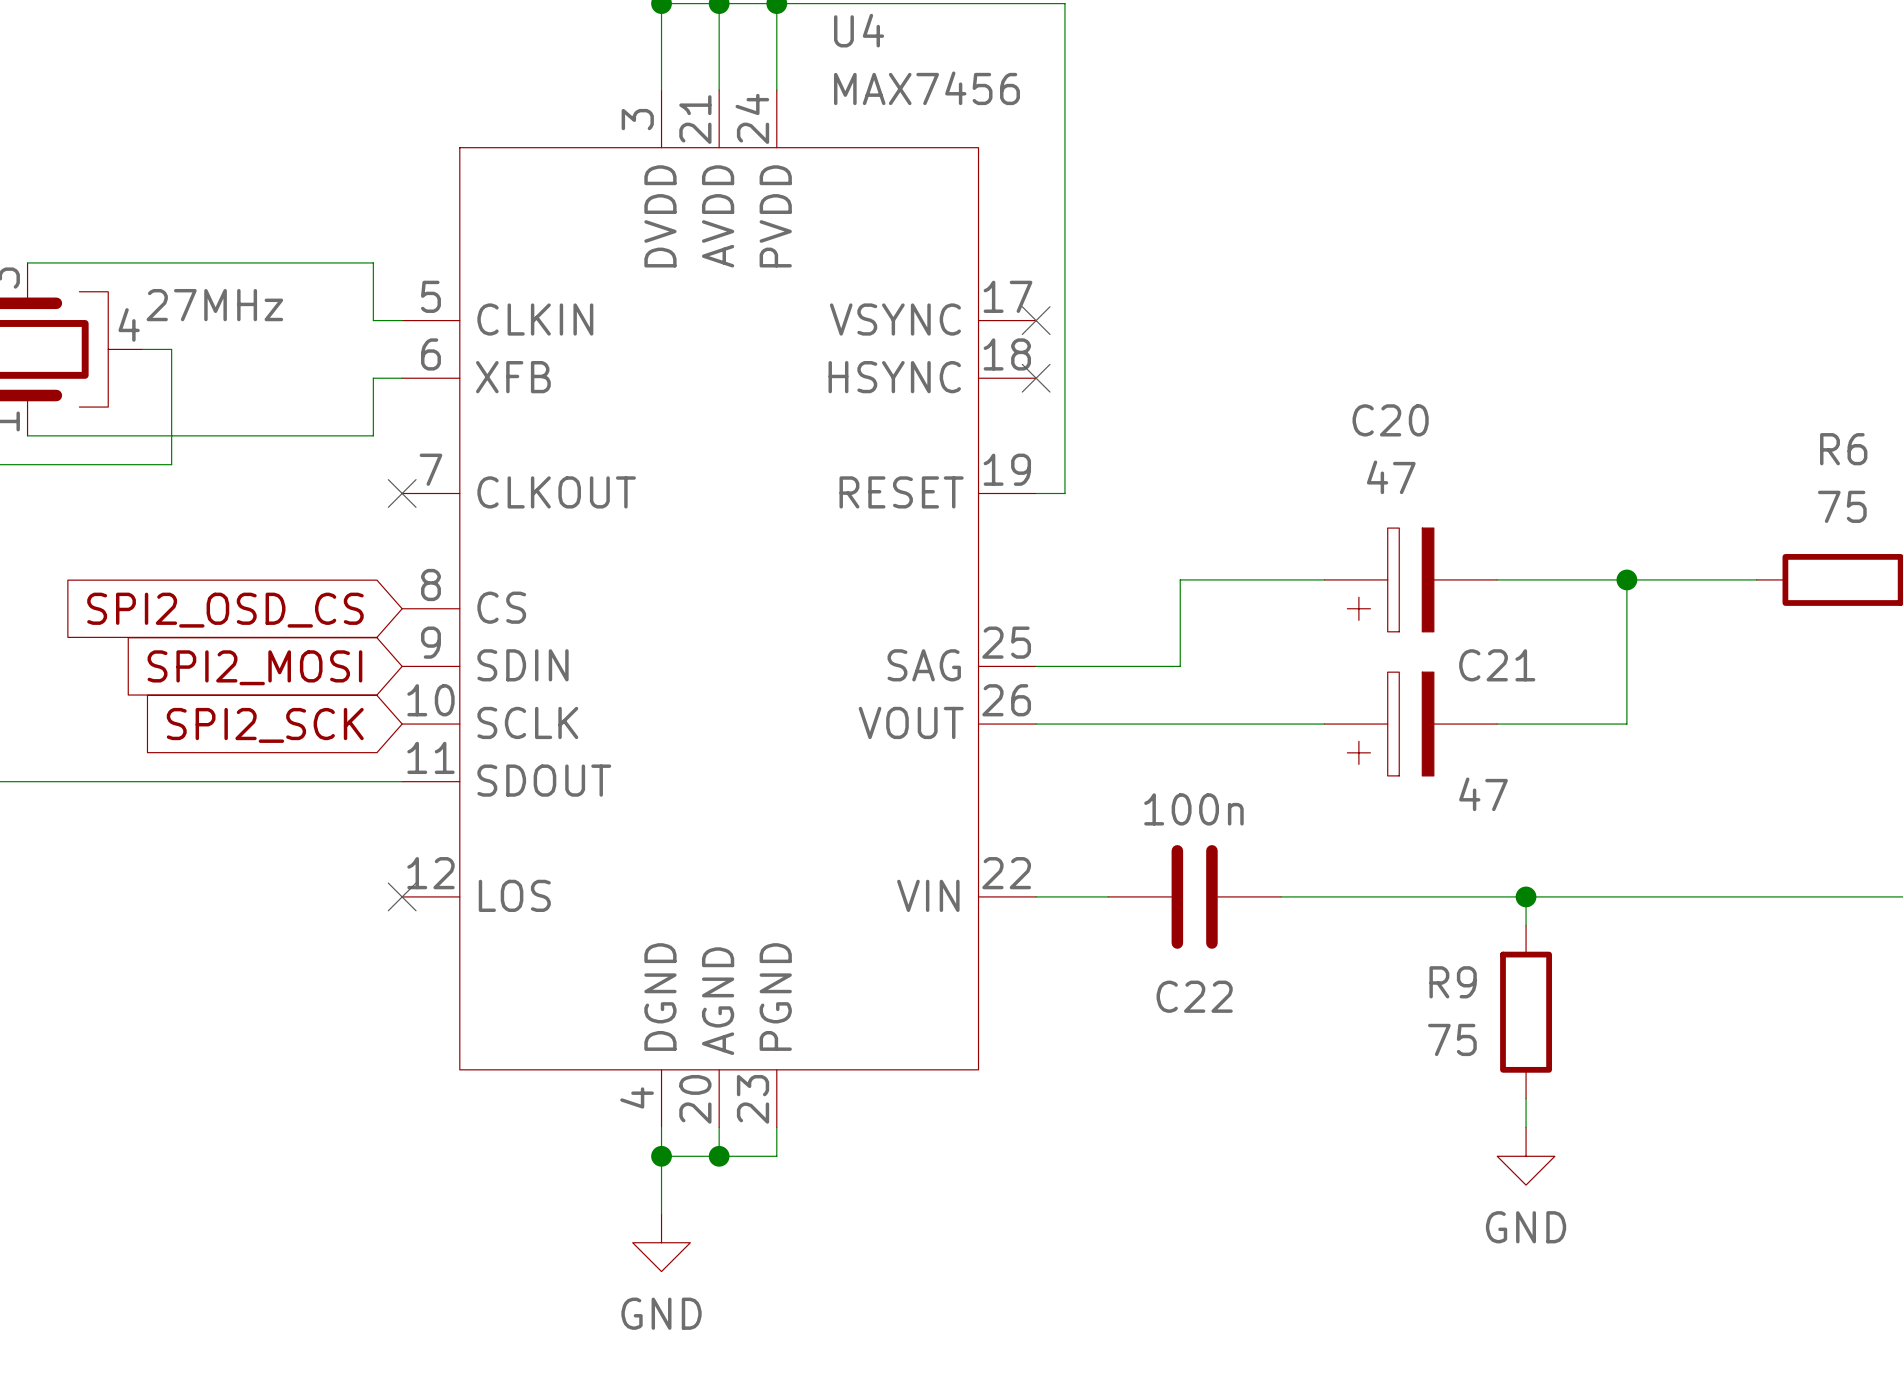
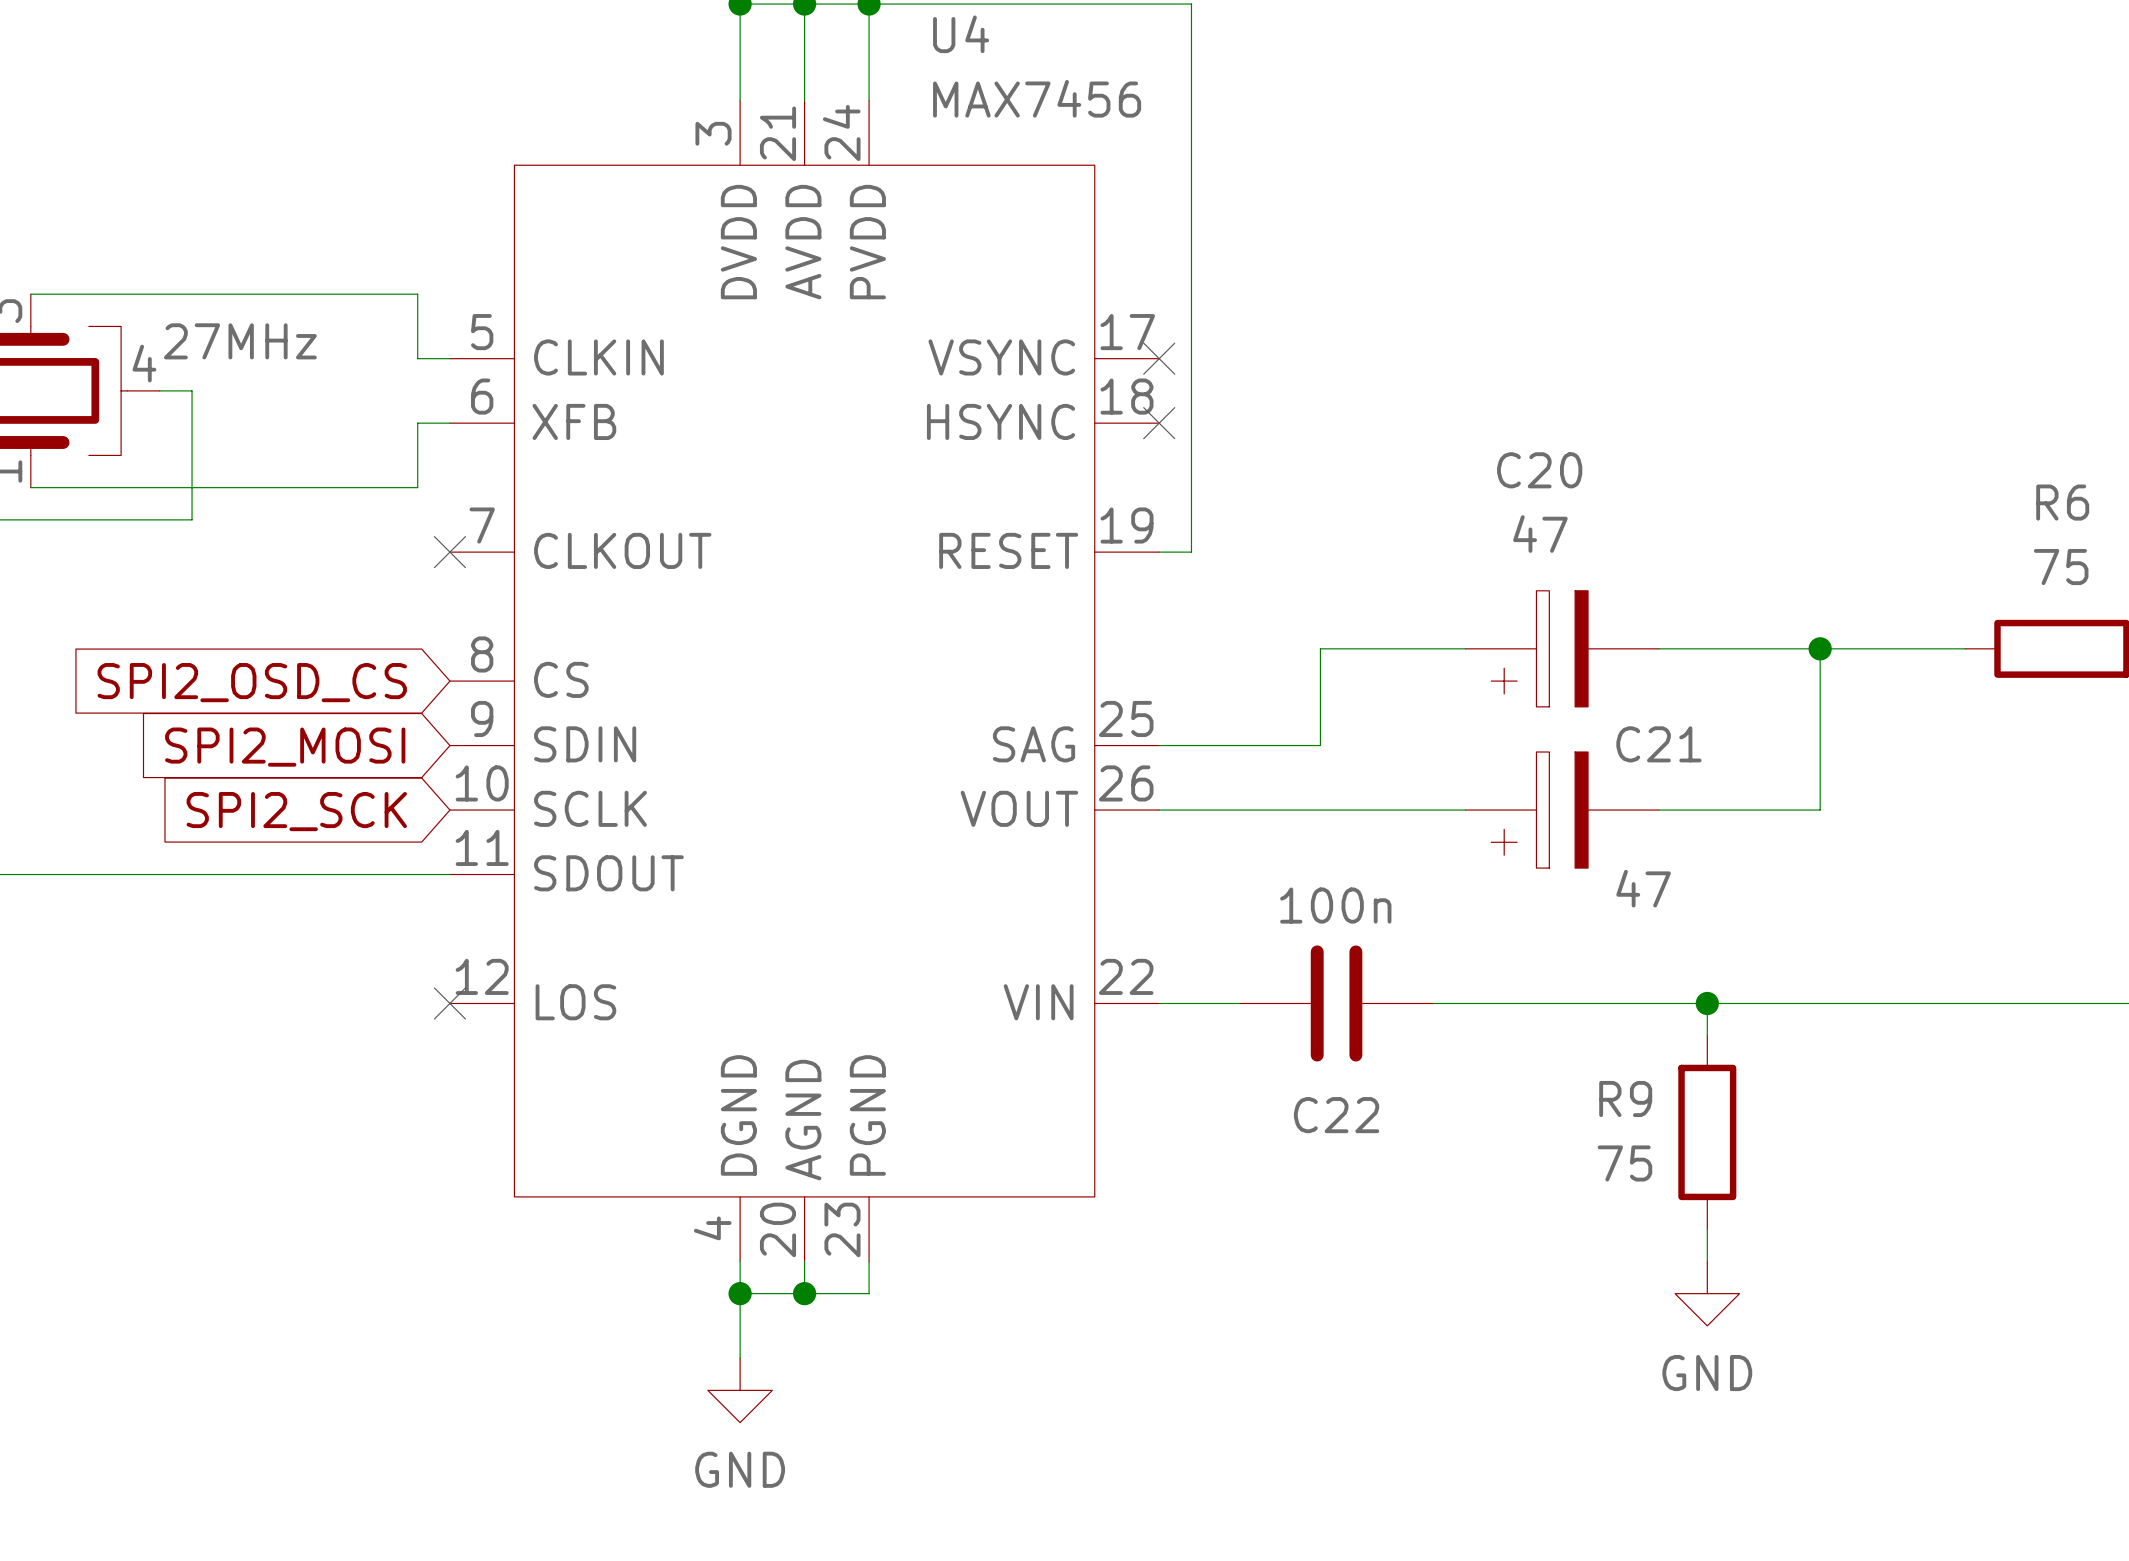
C20 position: (1410, 579) -> (1562, 648)
C21 position: (1410, 724) -> (1562, 810)

